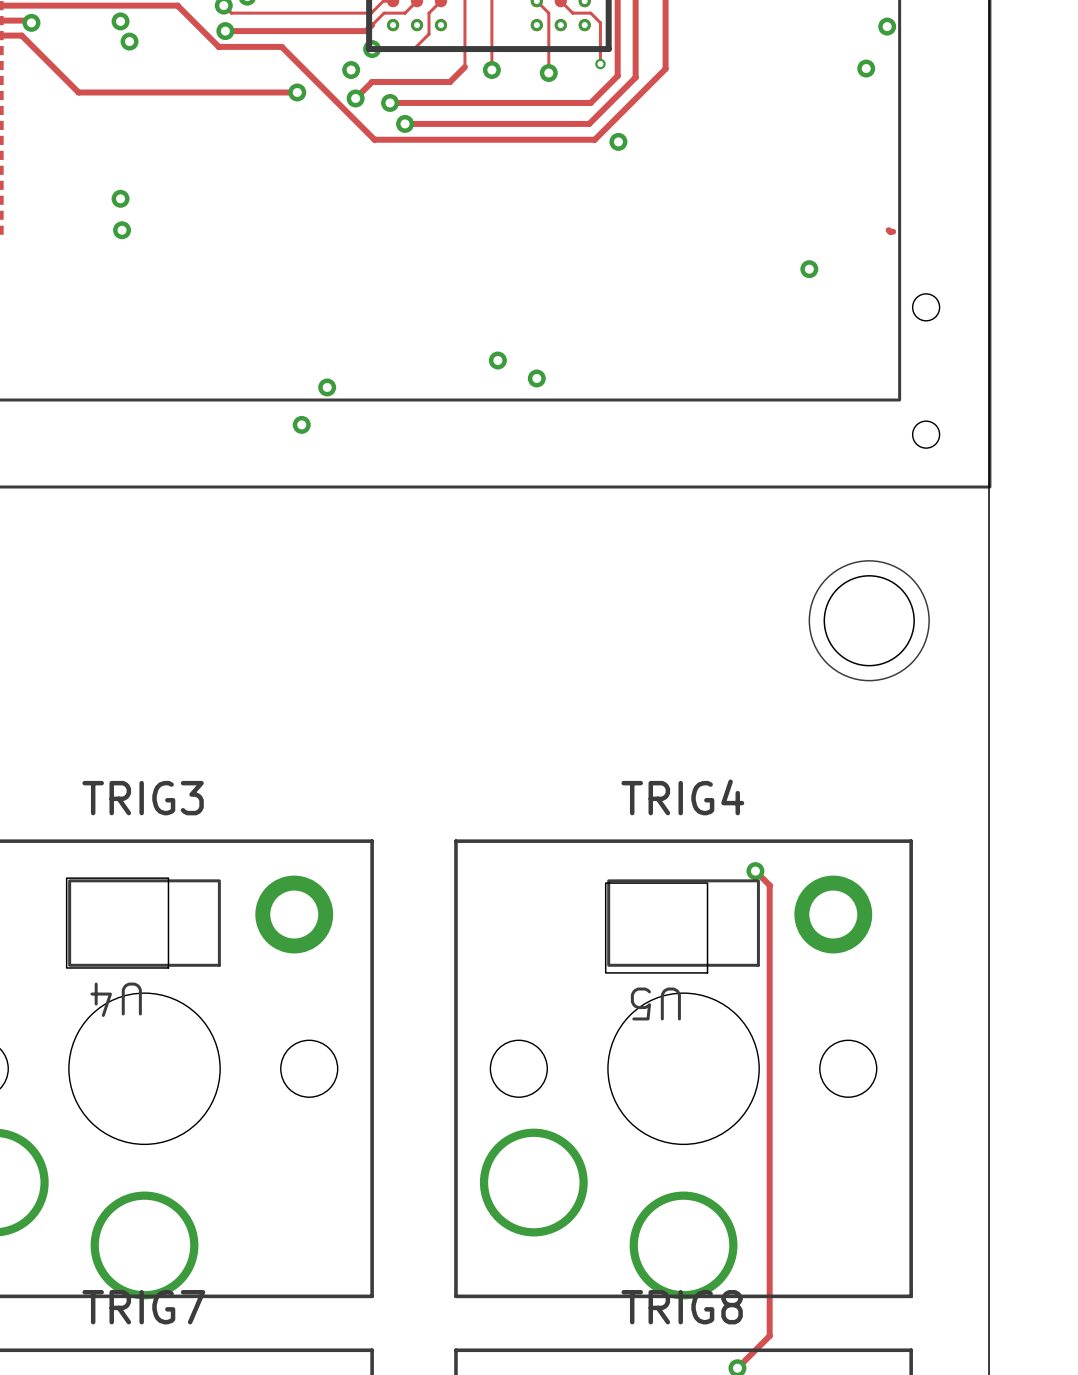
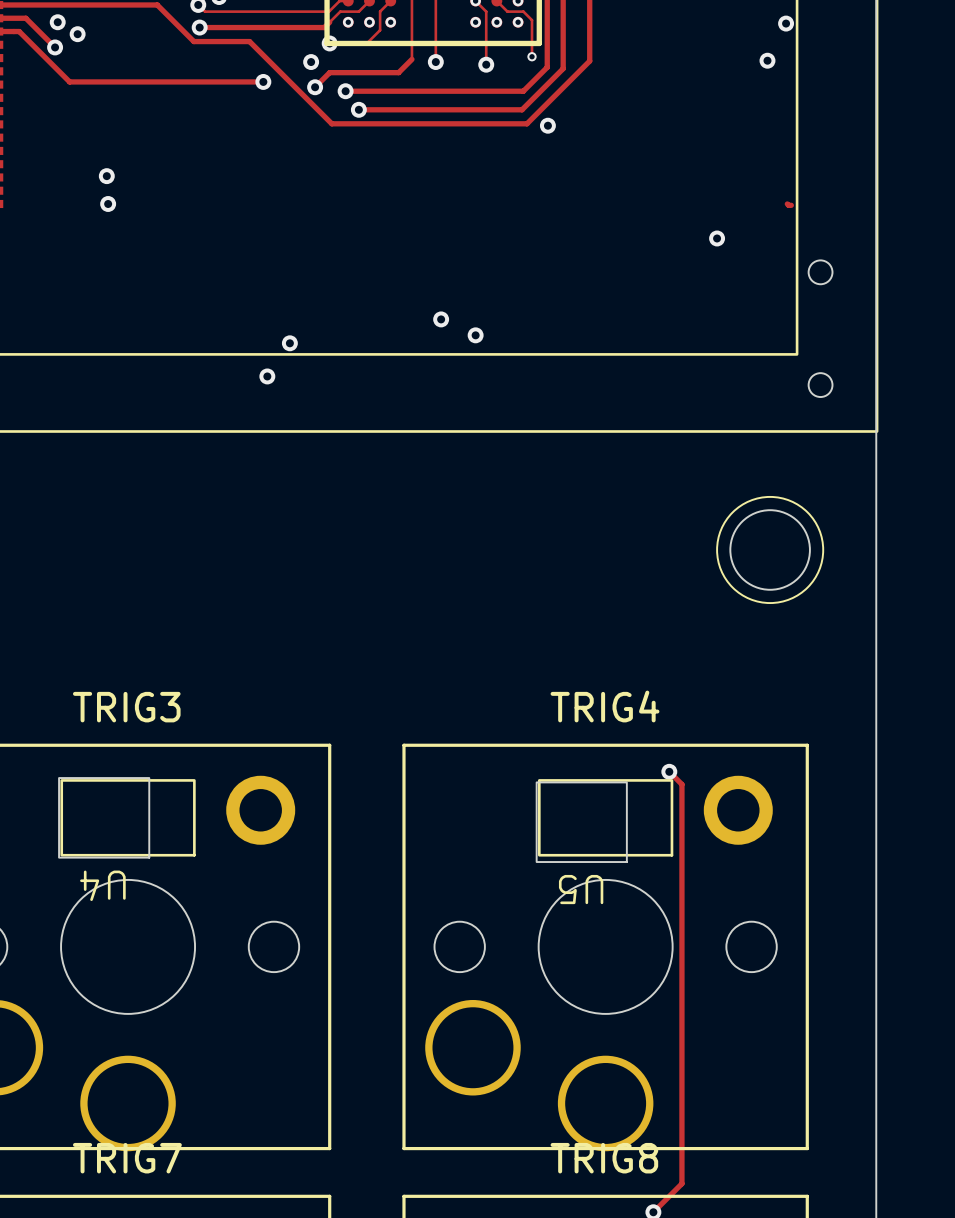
via: (120, 21) -> none
track: none -> (27, 20) (55, 47)
via: (31, 22) -> none
via: none -> (57, 22)
via: none -> (77, 34)
via: (129, 41) -> none
via: none -> (55, 47)

